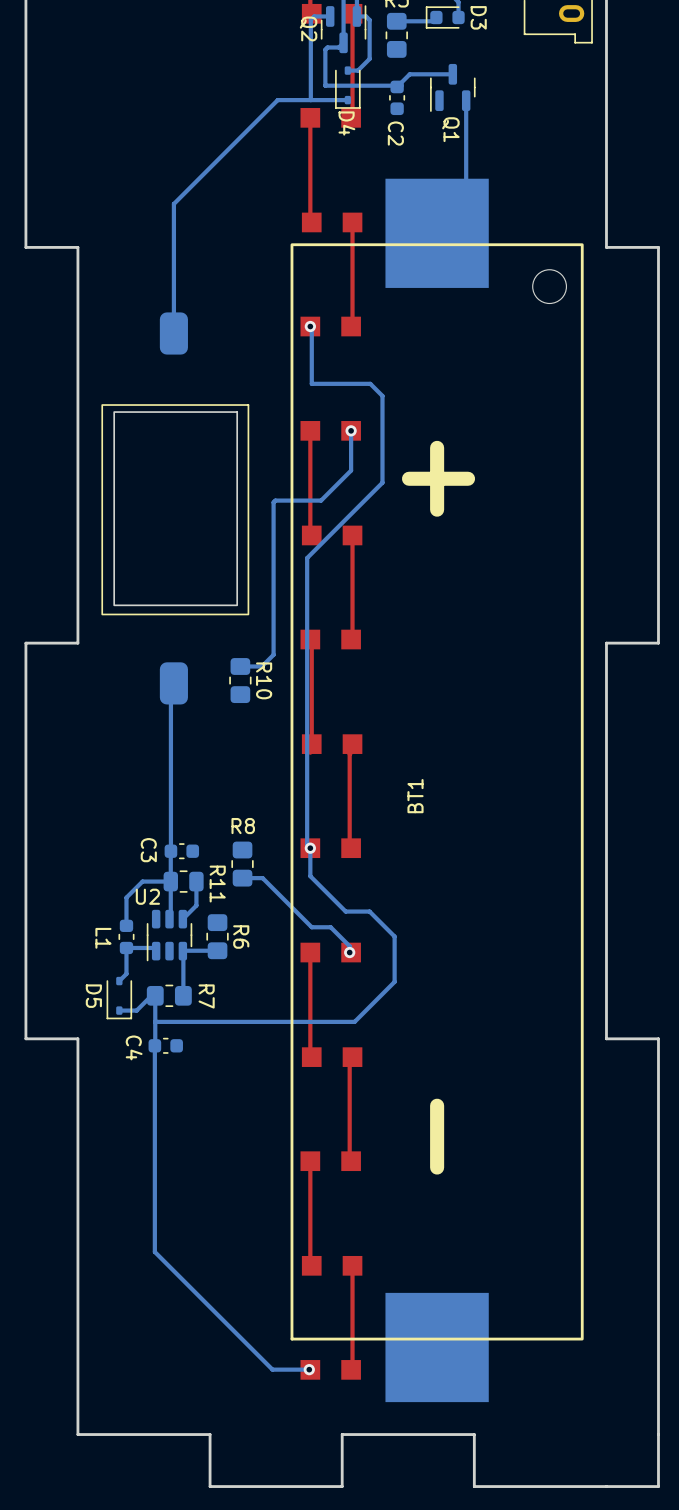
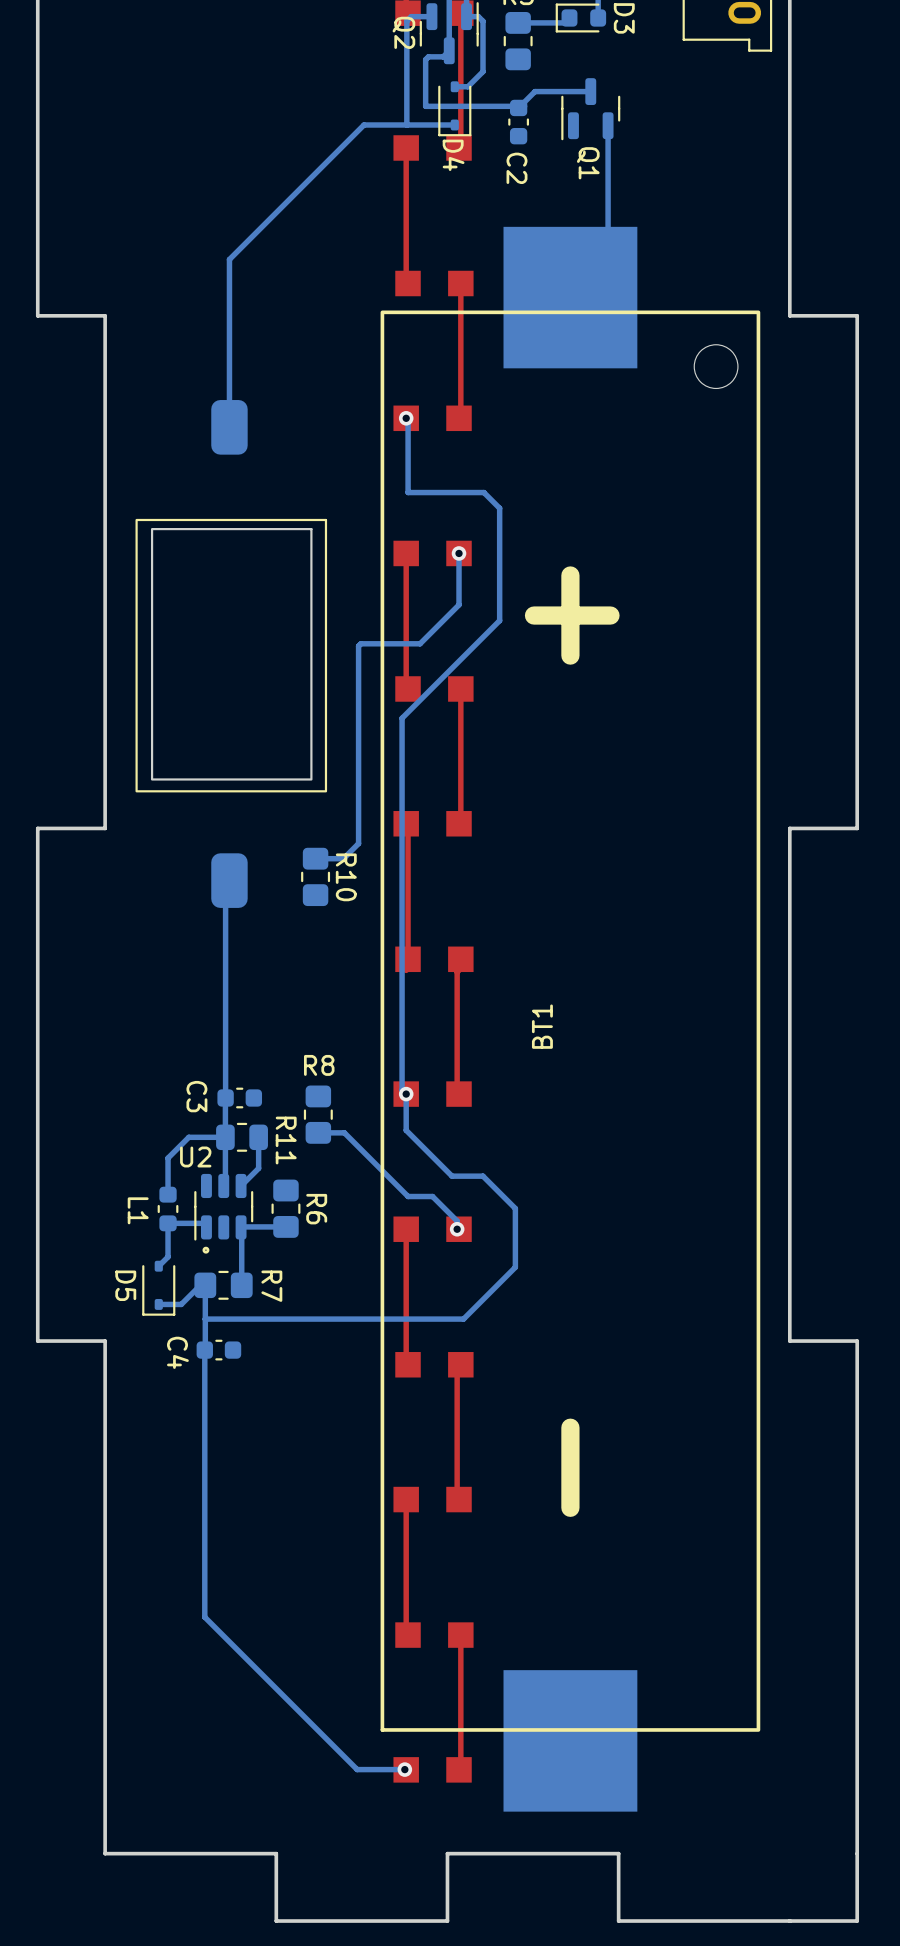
drawing: none -> [202, 1246, 210, 1254]

